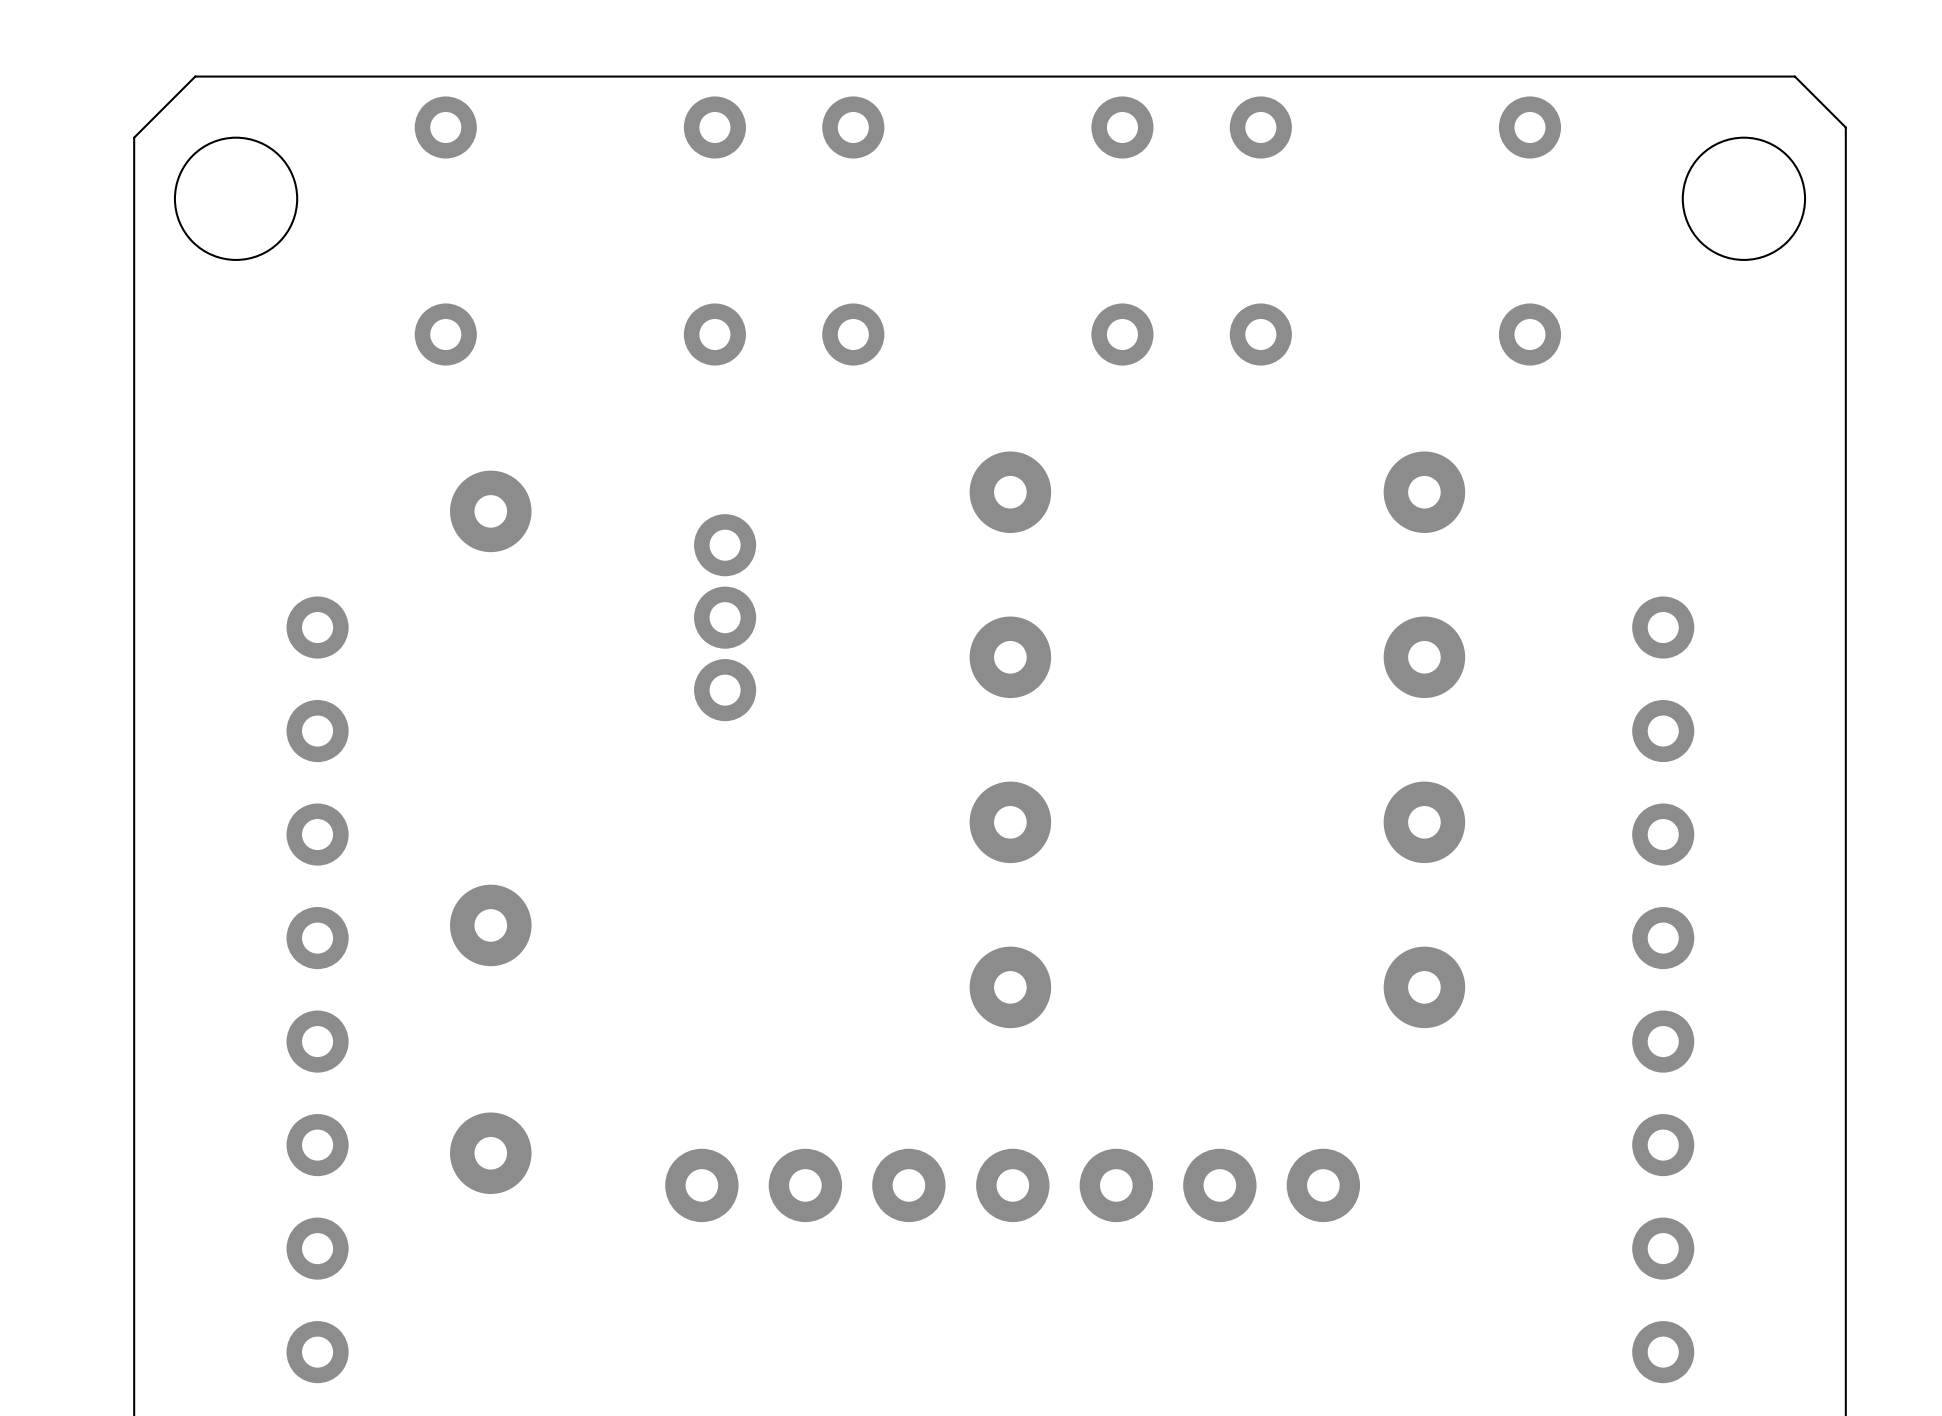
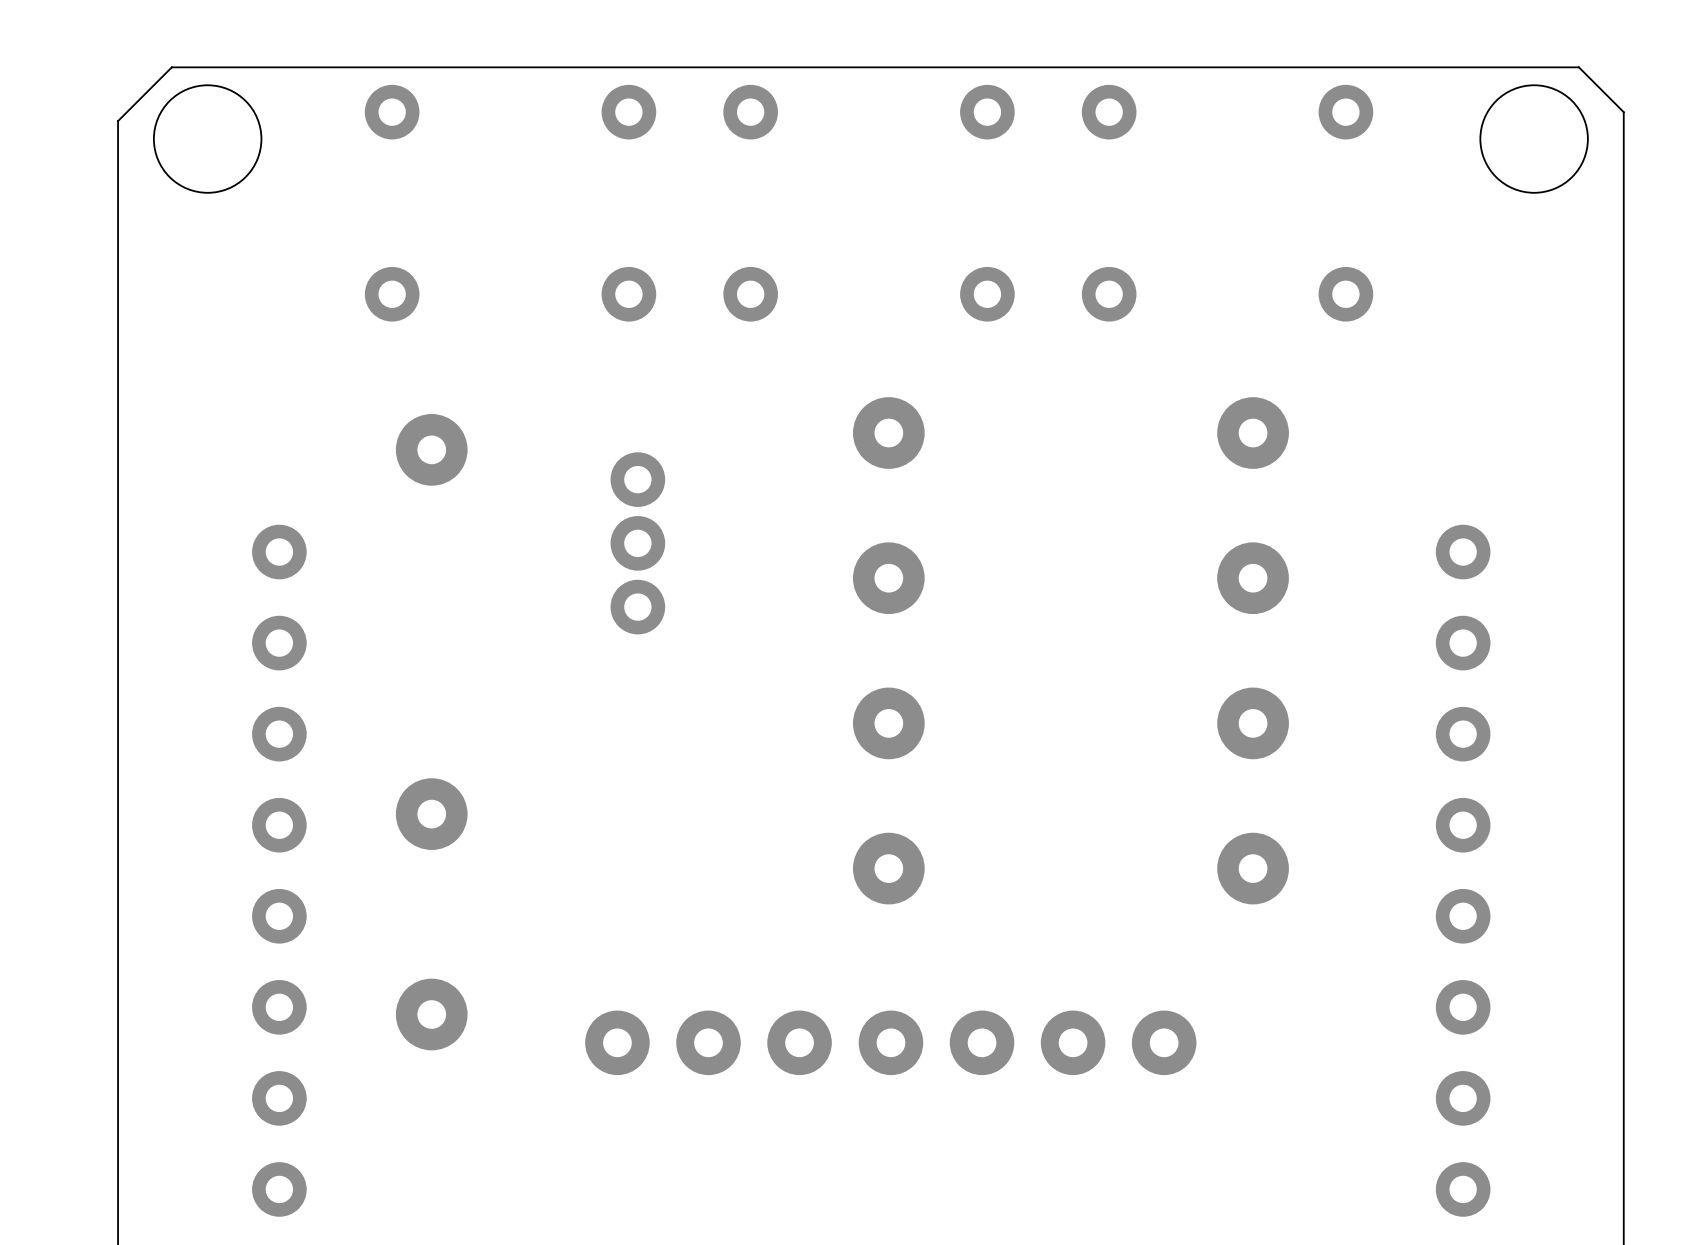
round board edge position: (236, 198) -> (207, 139)
round board edge position: (1743, 198) -> (1534, 139)

